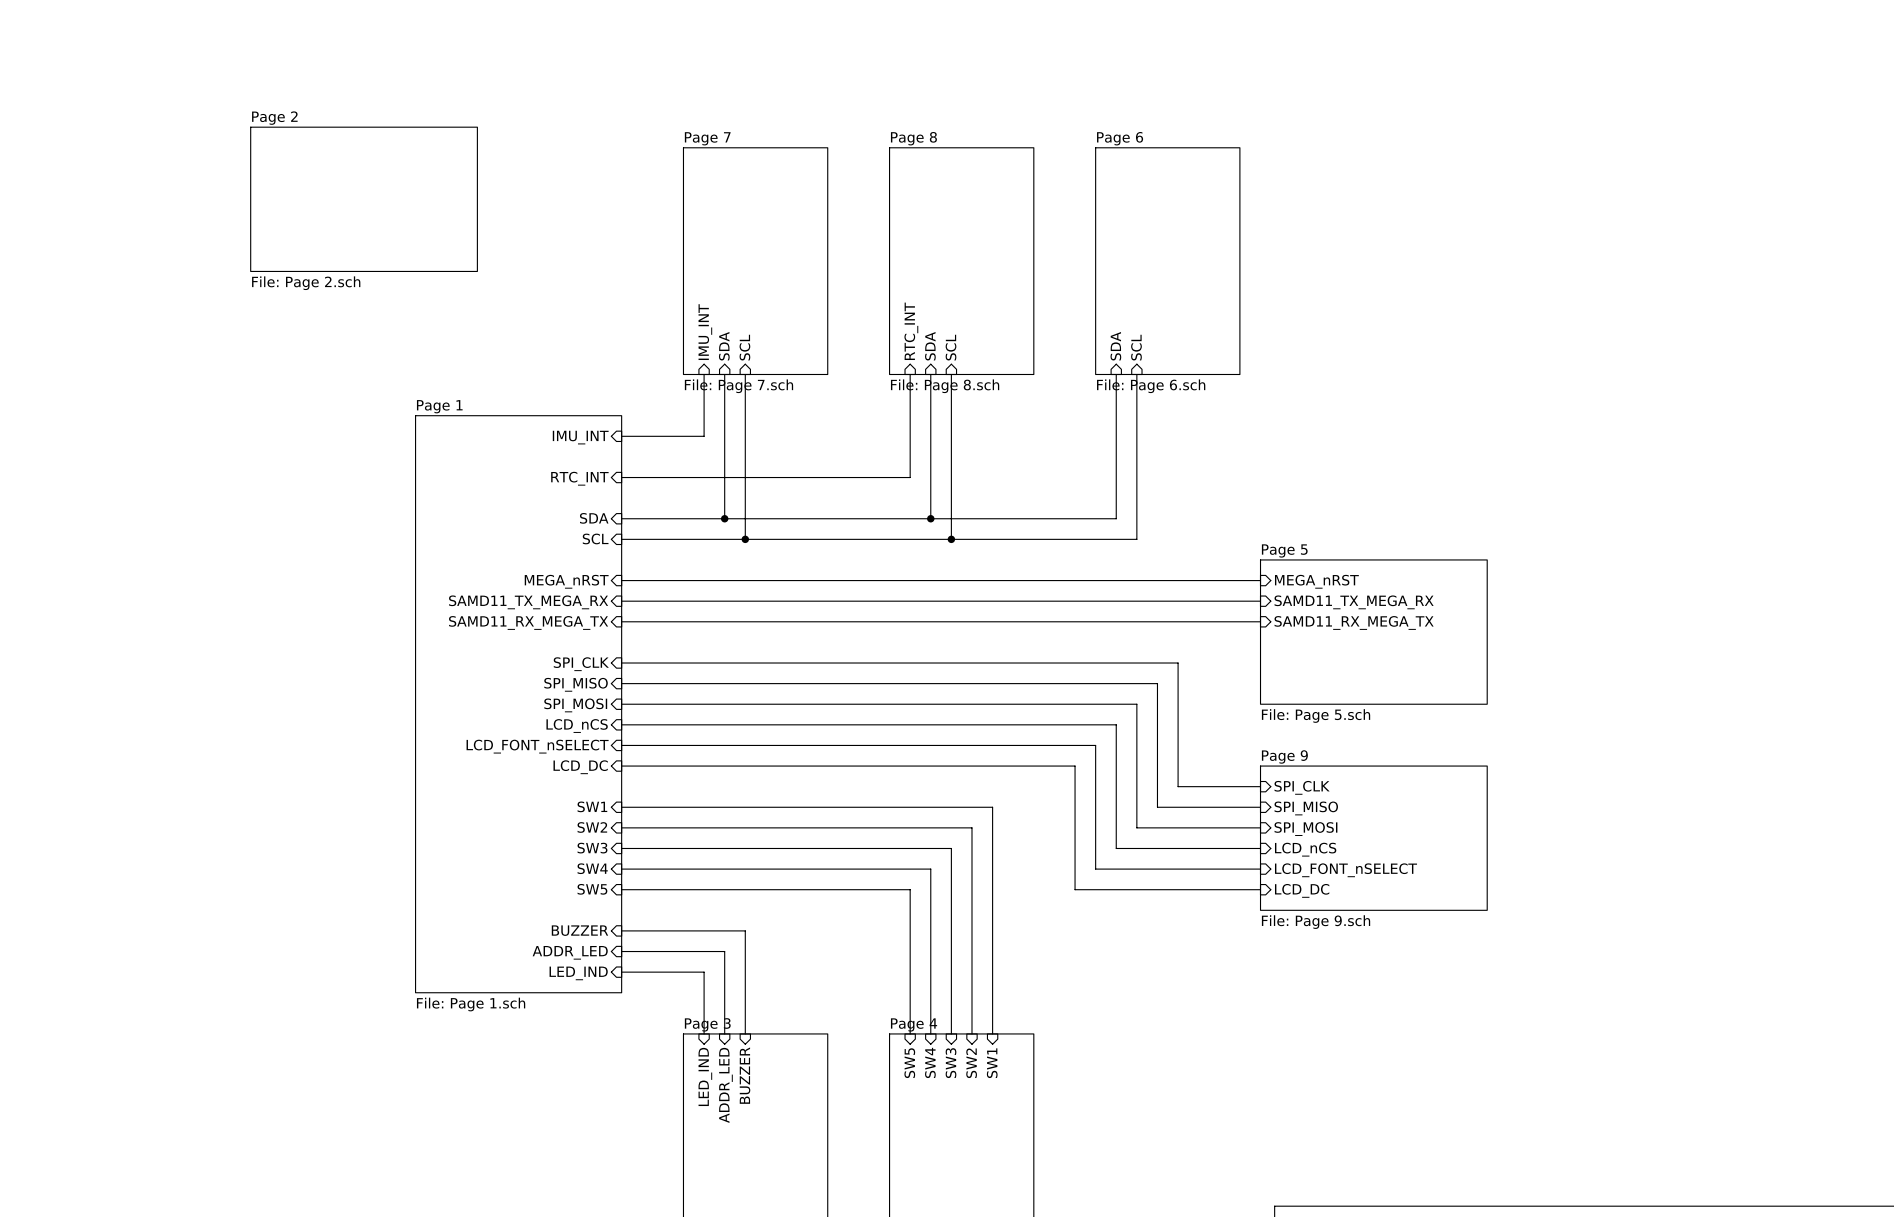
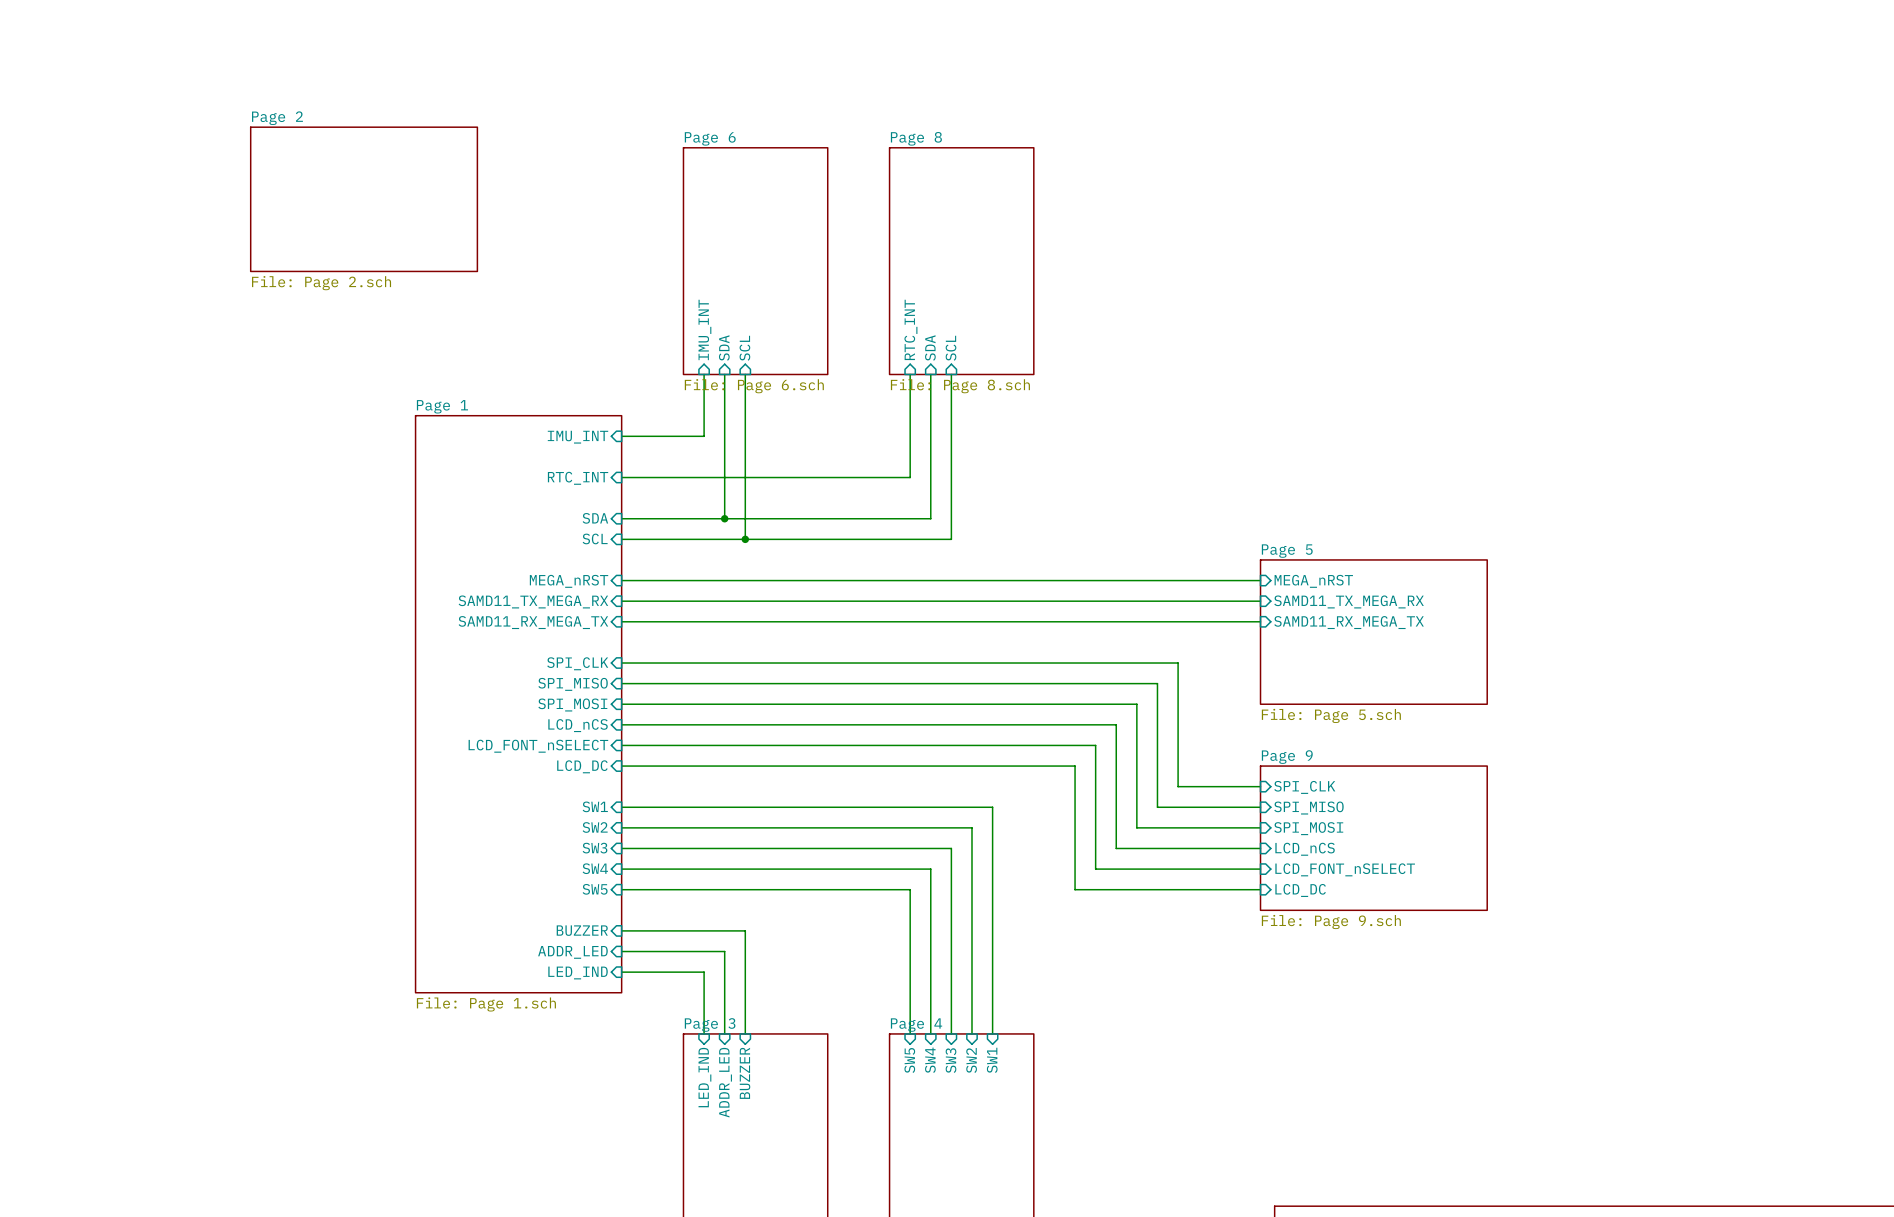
sheet Page 7 name: Page 7 (707, 138) -> Page 6 (710, 138)
sheet Page 6: File: Page 6.sch (1167, 261) -> none
sheet pin: SDA (1115, 346) -> none
sheet pin: SCL (1136, 347) -> none
wire: (1116, 374) (1116, 518) (930, 518) -> none
wire: (1136, 374) (1136, 539) (951, 539) -> none
sheet Page 7 value: File: Page 7.sch (738, 386) -> File: Page 6.sch (754, 386)
junction: (930, 518) -> none
junction: (951, 539) -> none

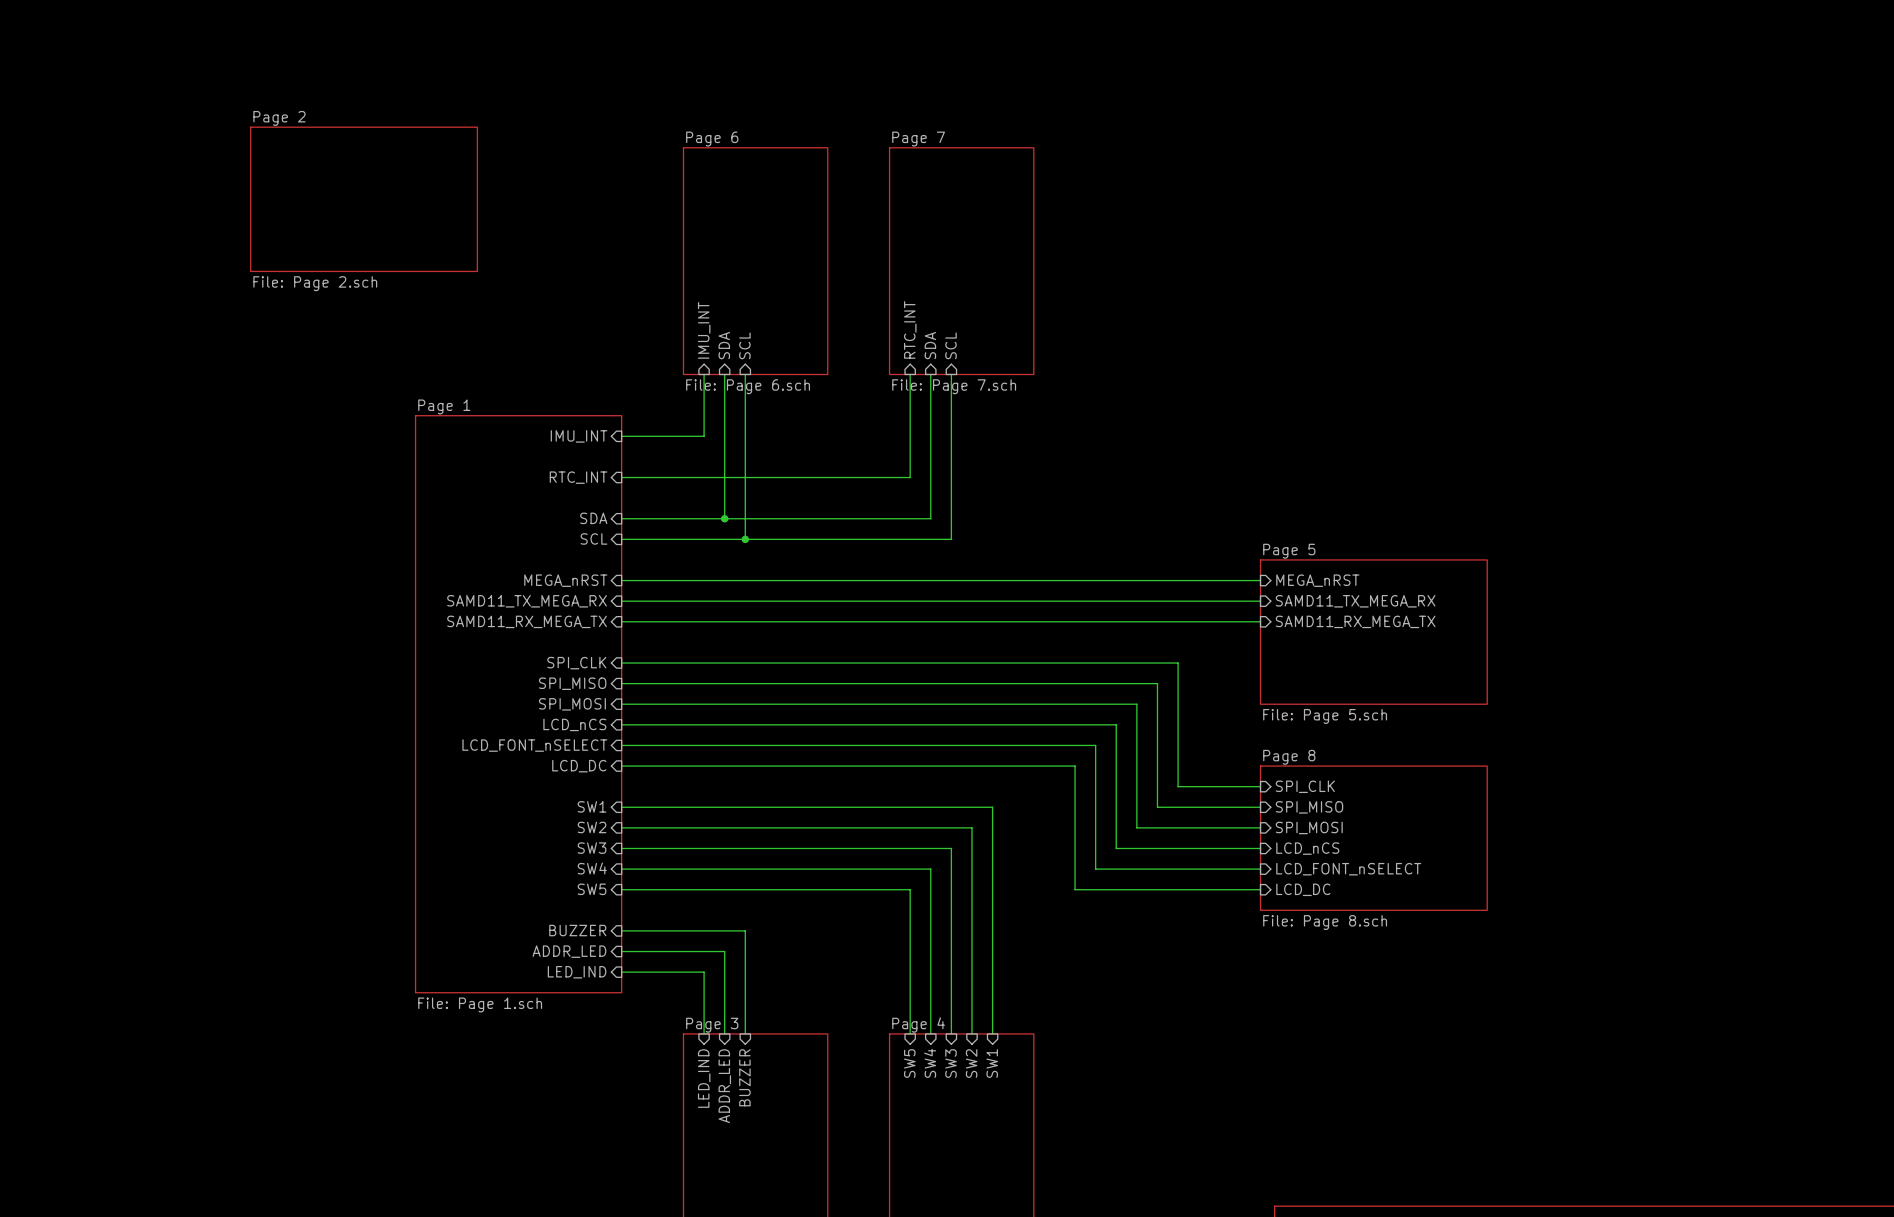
sheet Page 8 name: Page 8 (916, 138) -> Page 7 (918, 139)
sheet Page 8 value: File: Page 8.sch (960, 386) -> File: Page 7.sch (954, 386)
sheet Page 9 name: Page 9 (1287, 757) -> Page 8 (1289, 757)
sheet Page 9 value: File: Page 9.sch (1331, 922) -> File: Page 8.sch (1325, 922)

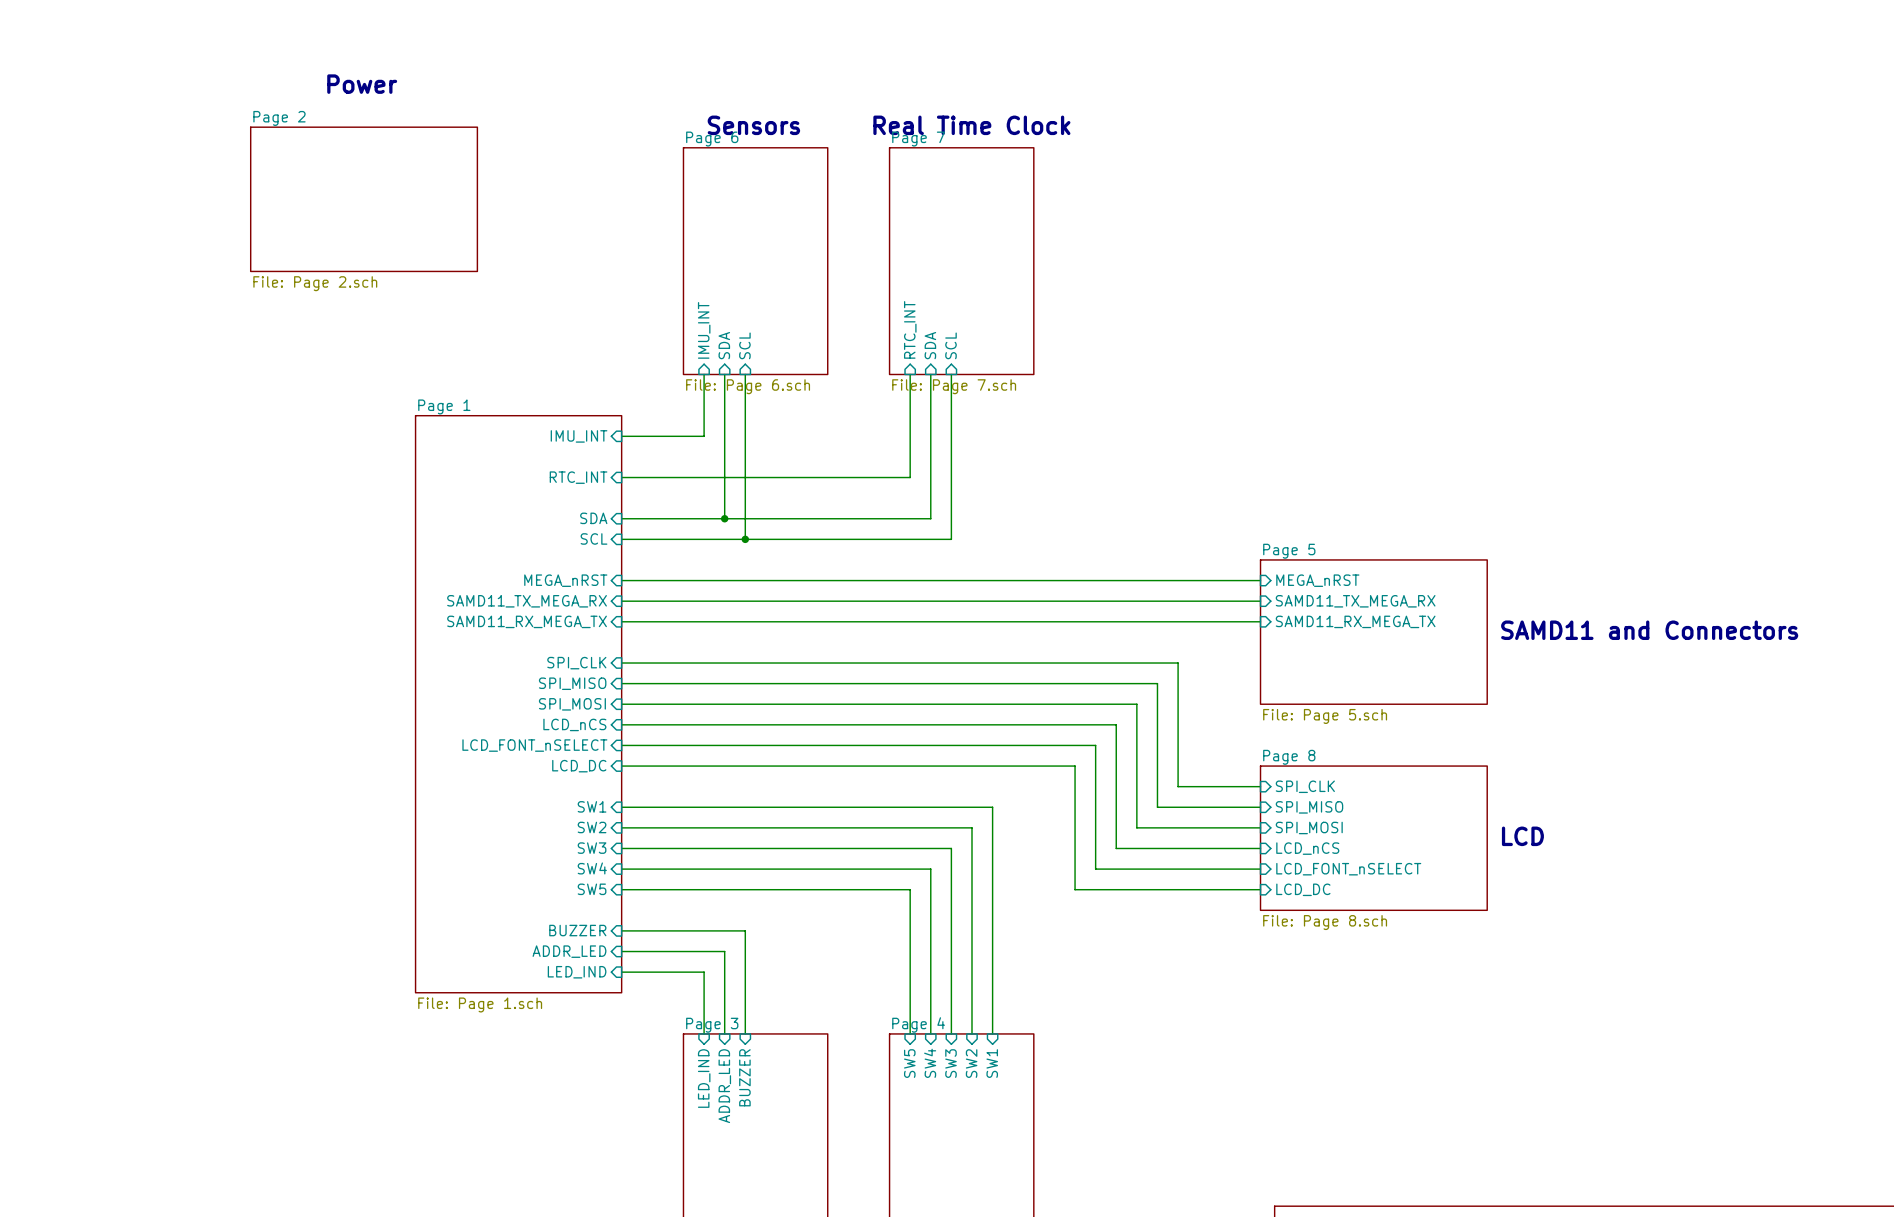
text: none -> Power (362, 84)
text: none -> Sensors (753, 125)
text: none -> Real Time Clock (971, 125)
text: none -> SAMD11 and Connectors (1649, 630)
text: none -> LCD (1522, 836)

